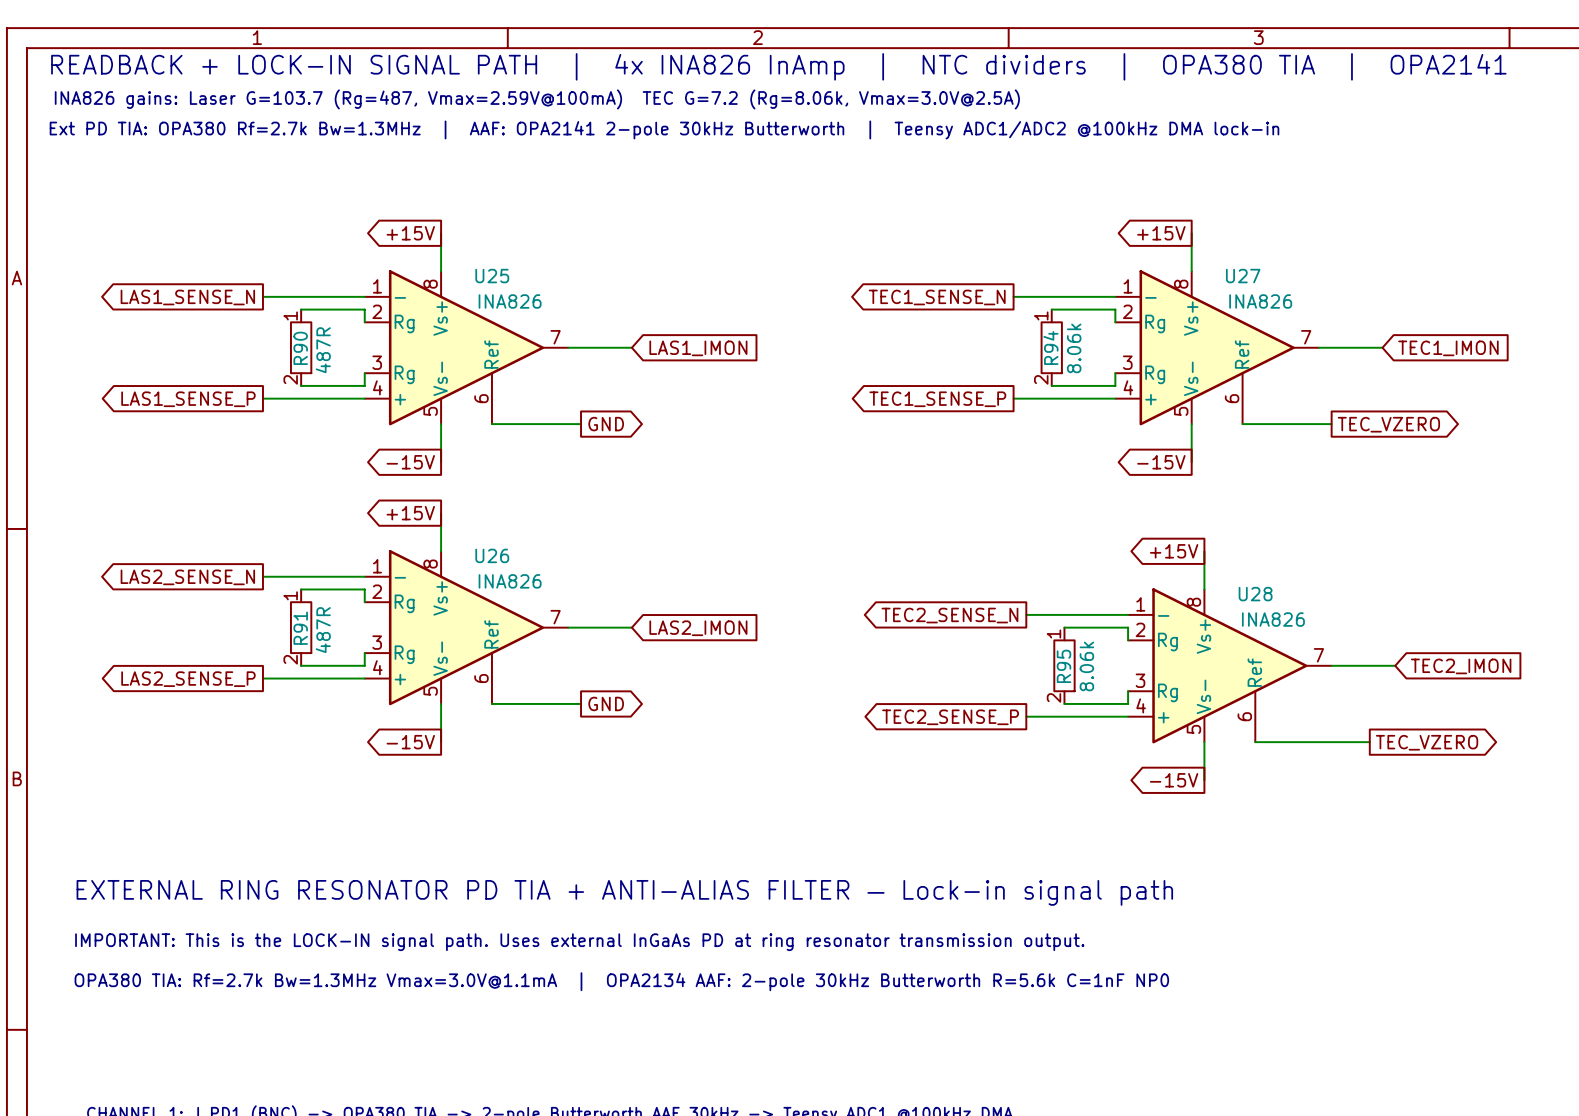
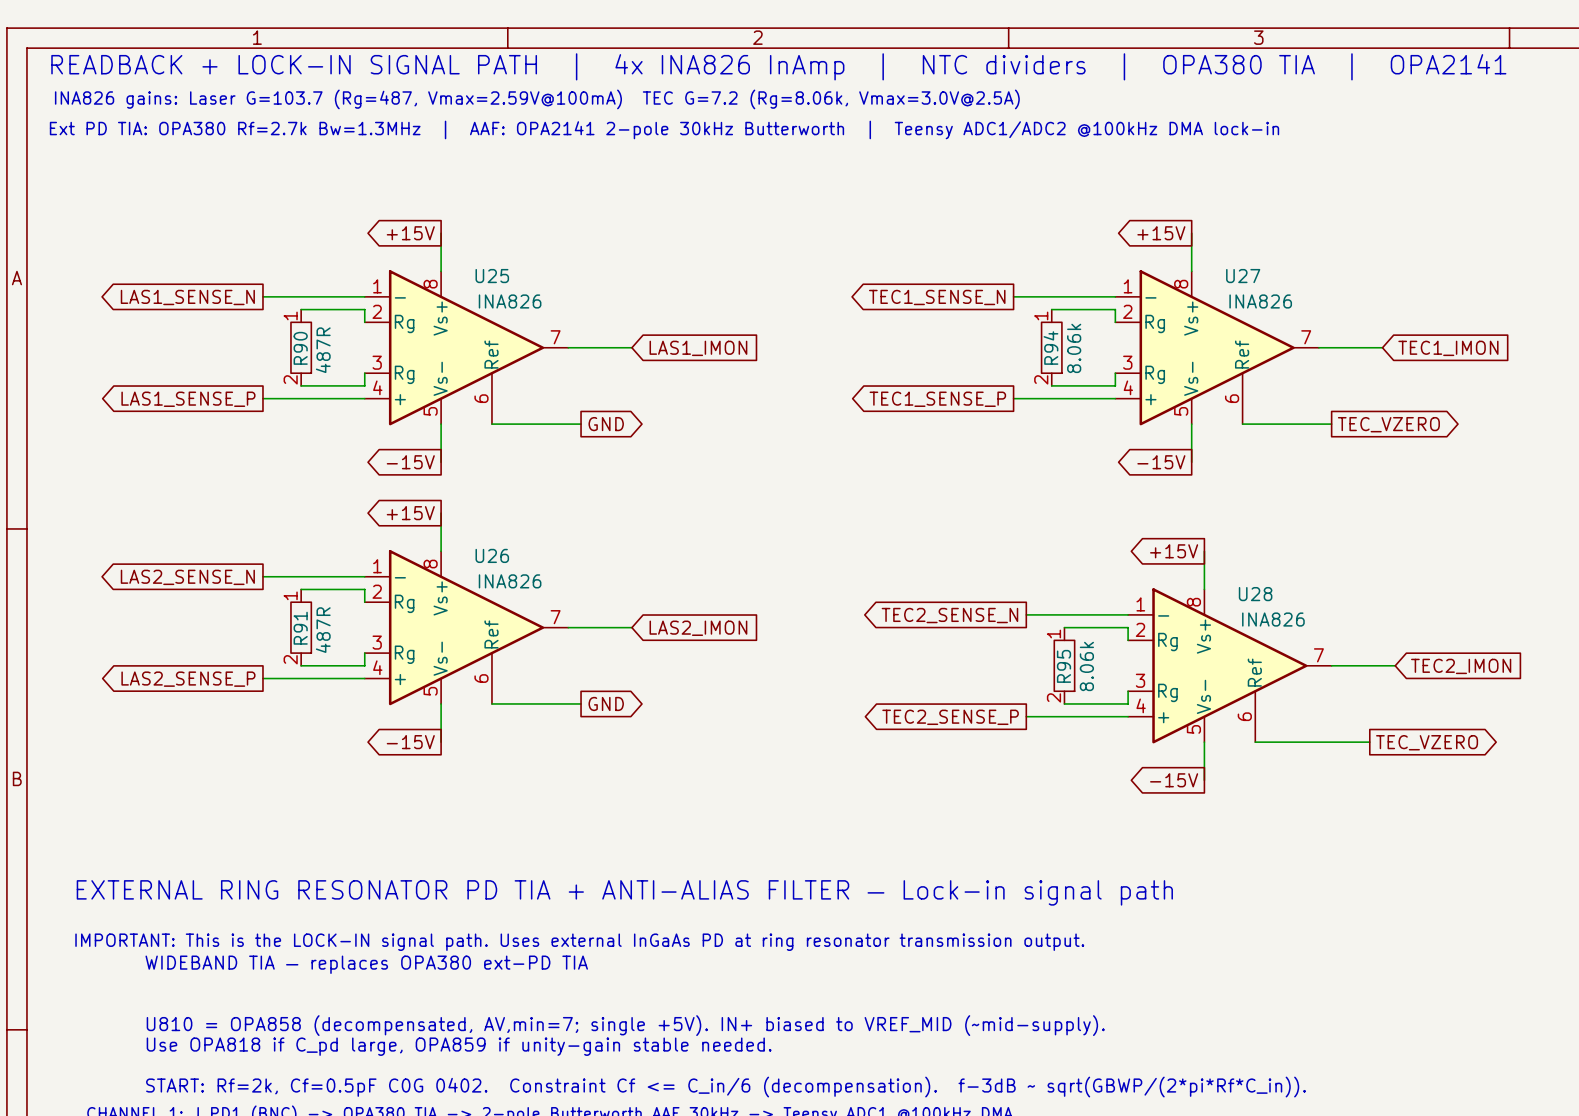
text: none -> WIDEBAND TIA — replaces OPA380 ext-PD TIA (366, 964)
text: OPA380 TIA: Rf=2.7k Bw=1.3MHz Vmax=3.0V@1.1mA | OPA2134 AAF: 2-pole 30kHz Butterworth R=5.6k C=1nF NP0 (621, 981) -> none
text: none -> U810 = OPA858 (decompensated, AV,min=7; single +5V). IN+ biased to VREF_MID (~mid-supply). (625, 1025)
text: none -> Use OPA818 if C_pd large, OPA859 if unity-gain stable needed. (459, 1046)
text: none -> START: Rf=2k, Cf=0.5pF C0G 0402. Constraint Cf <= C_in/6 (decompensation). f-3dB ~ sqrt(GBWP/(2*pi*Rf*C_in)). (725, 1087)

